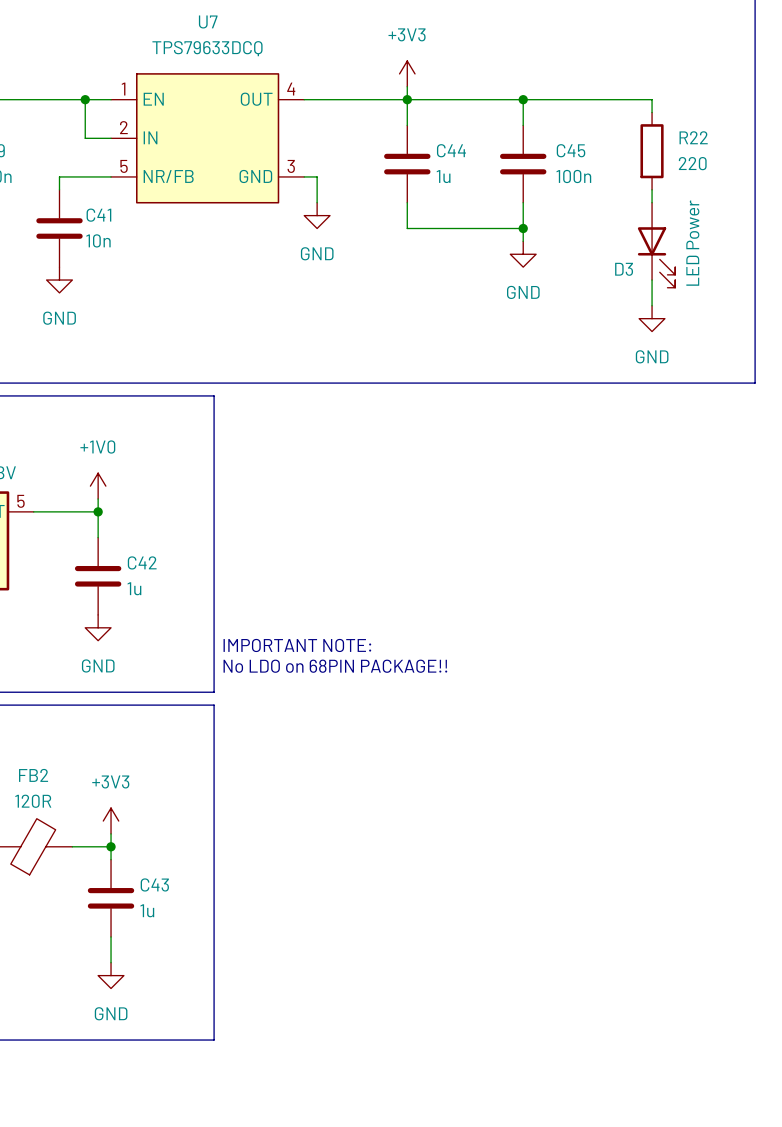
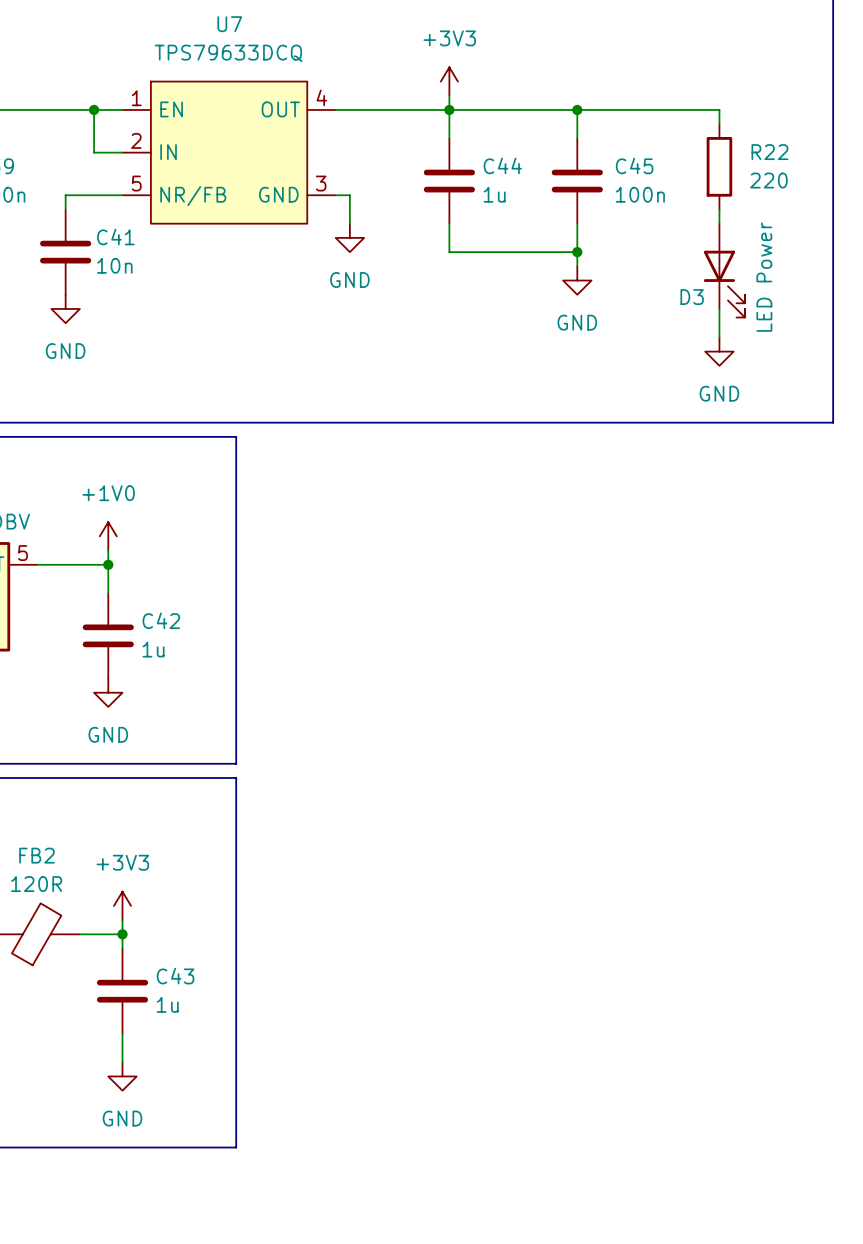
text: IMPORTANT NOTE: (297, 645) -> none
text: No LDO on 68PIN PACKAGE!! (335, 666) -> none

